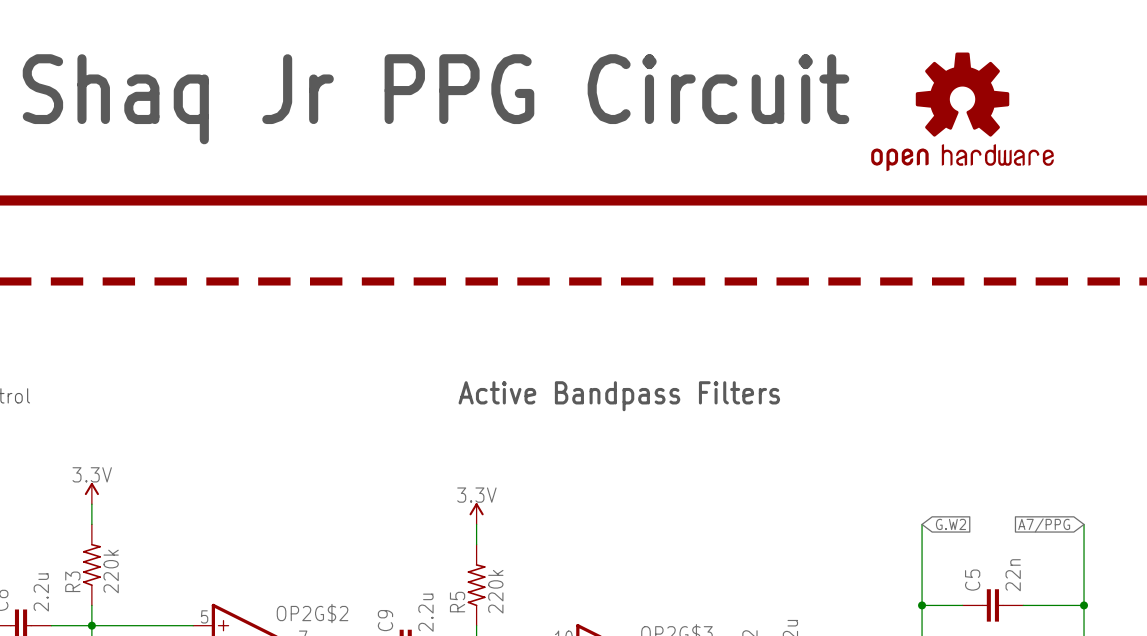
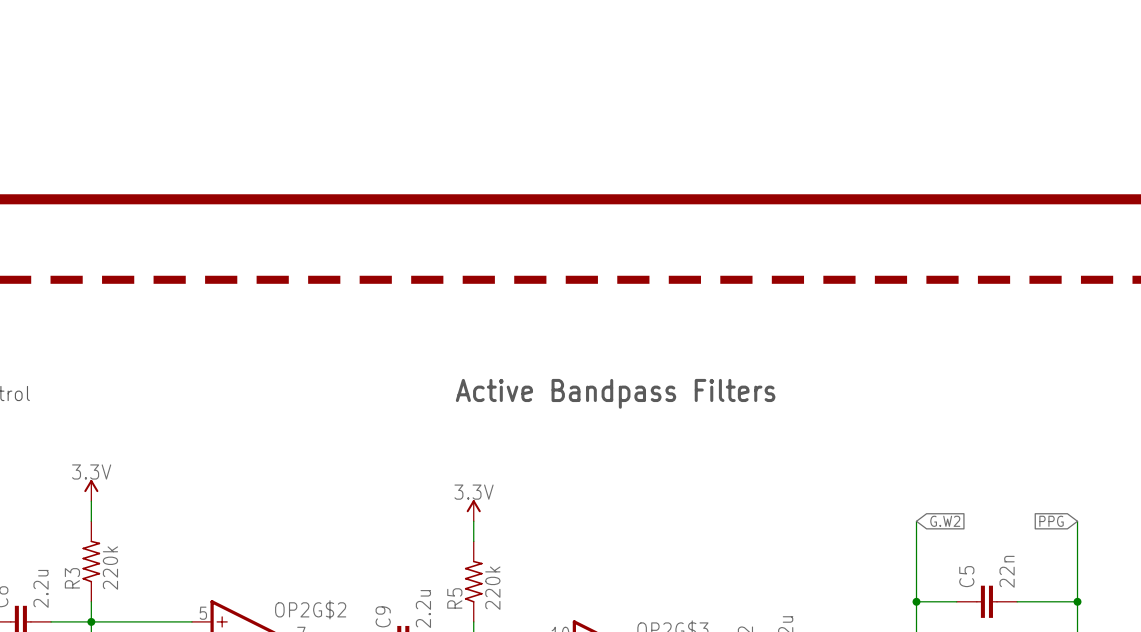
text: Shaq Jr PPG Circuit (436, 99) -> none
part: (962, 111) -> none
global label: A7/PPG (1044, 525) -> PPG (1051, 521)

